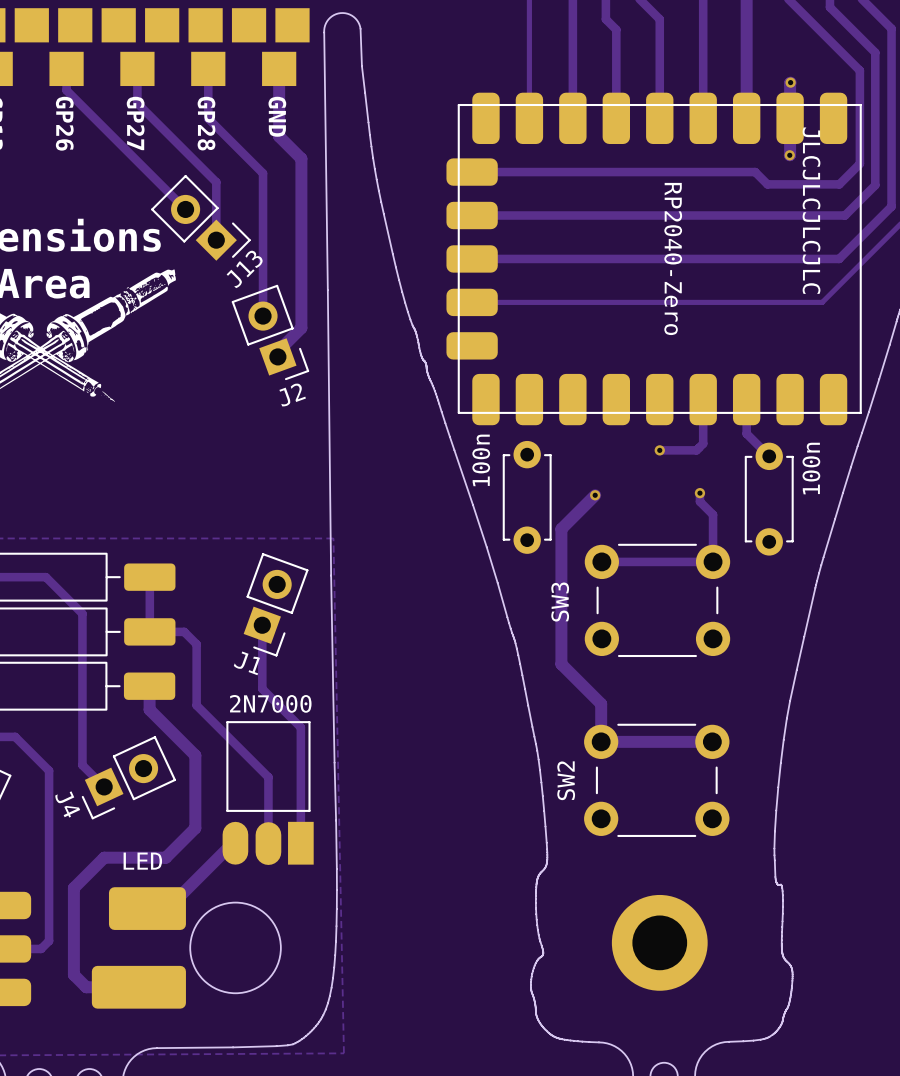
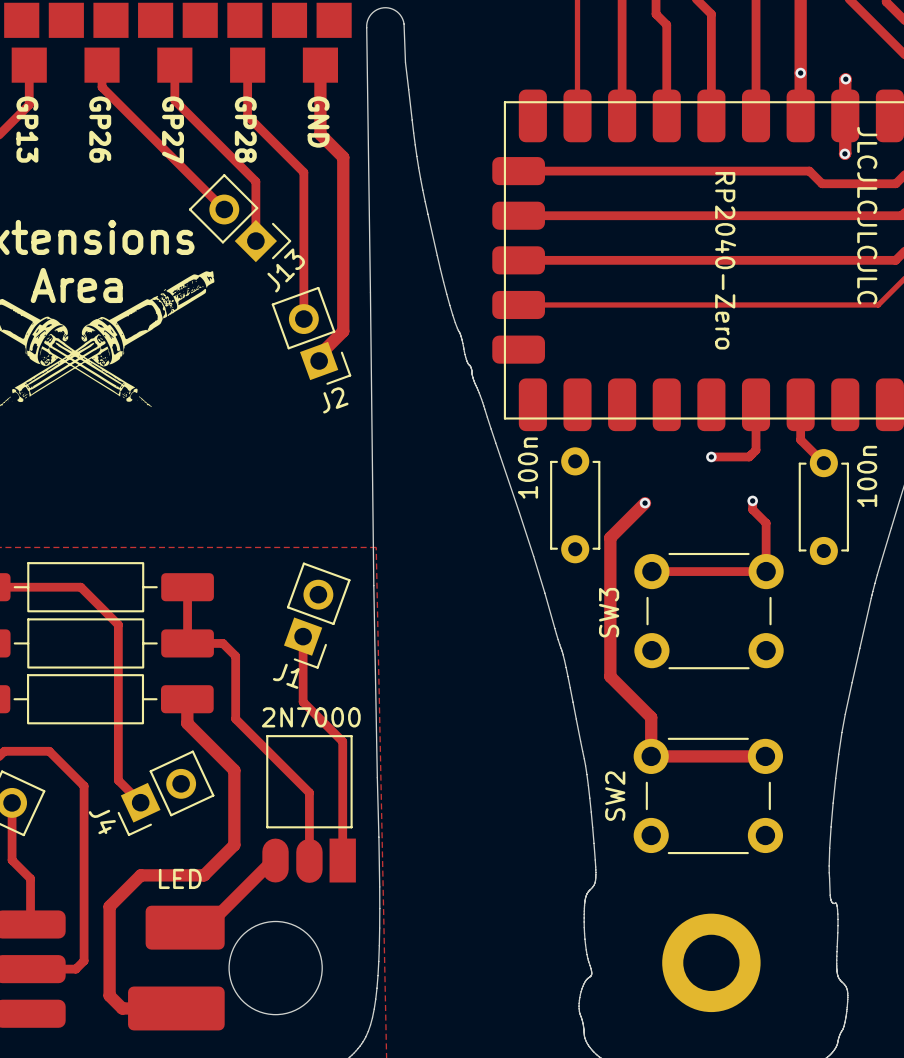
via: none -> (800, 73)

